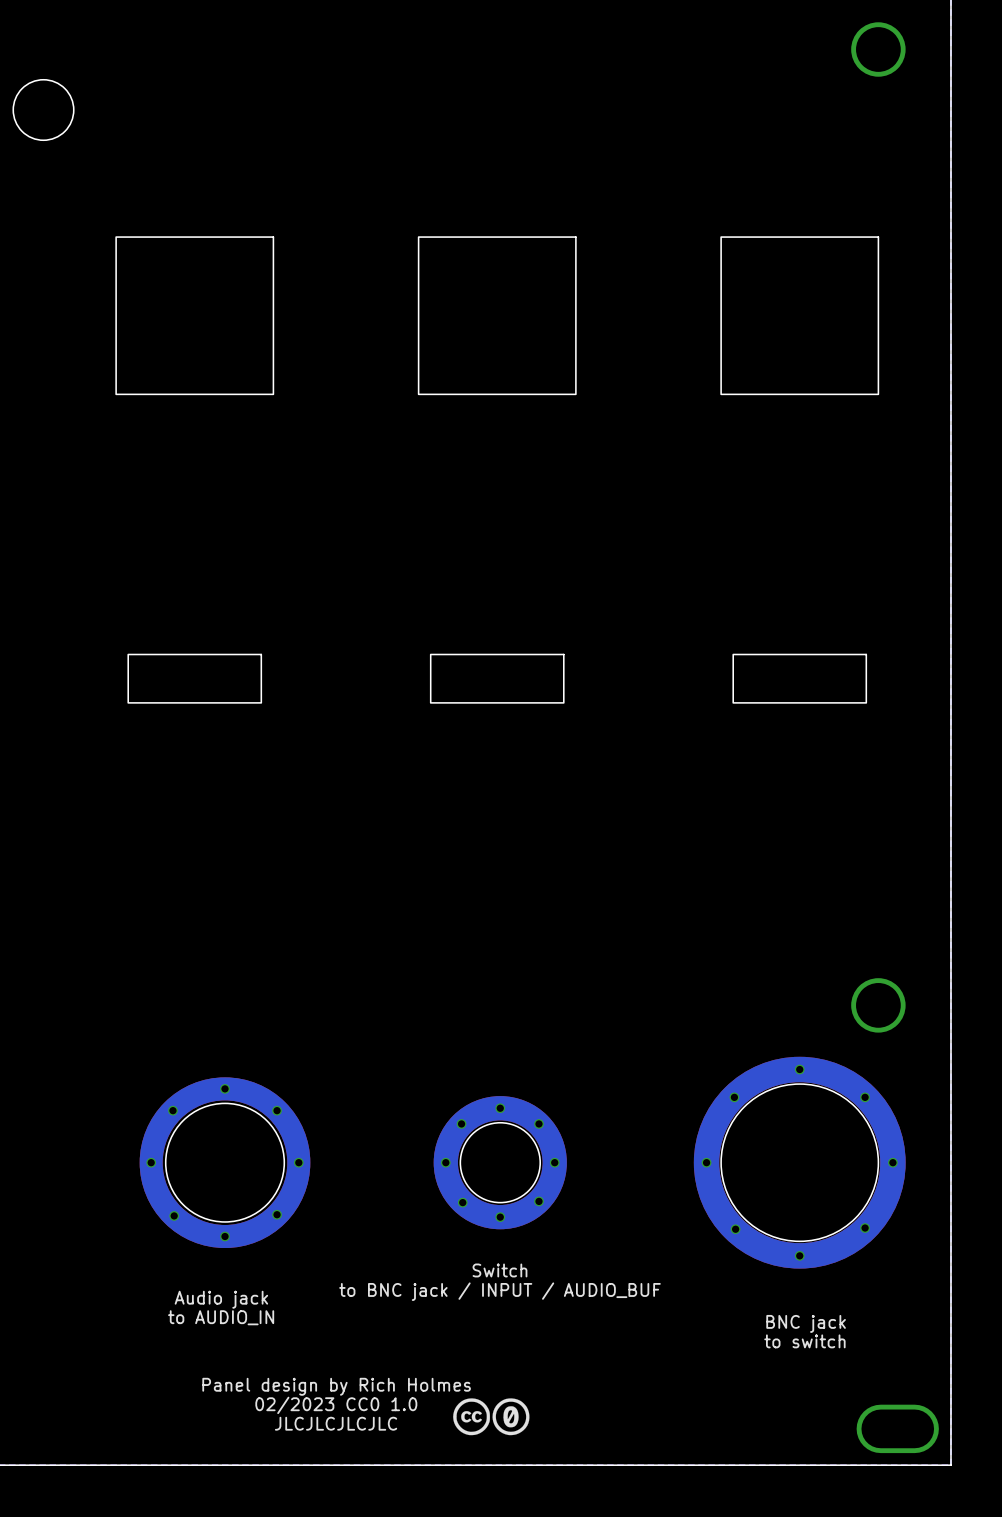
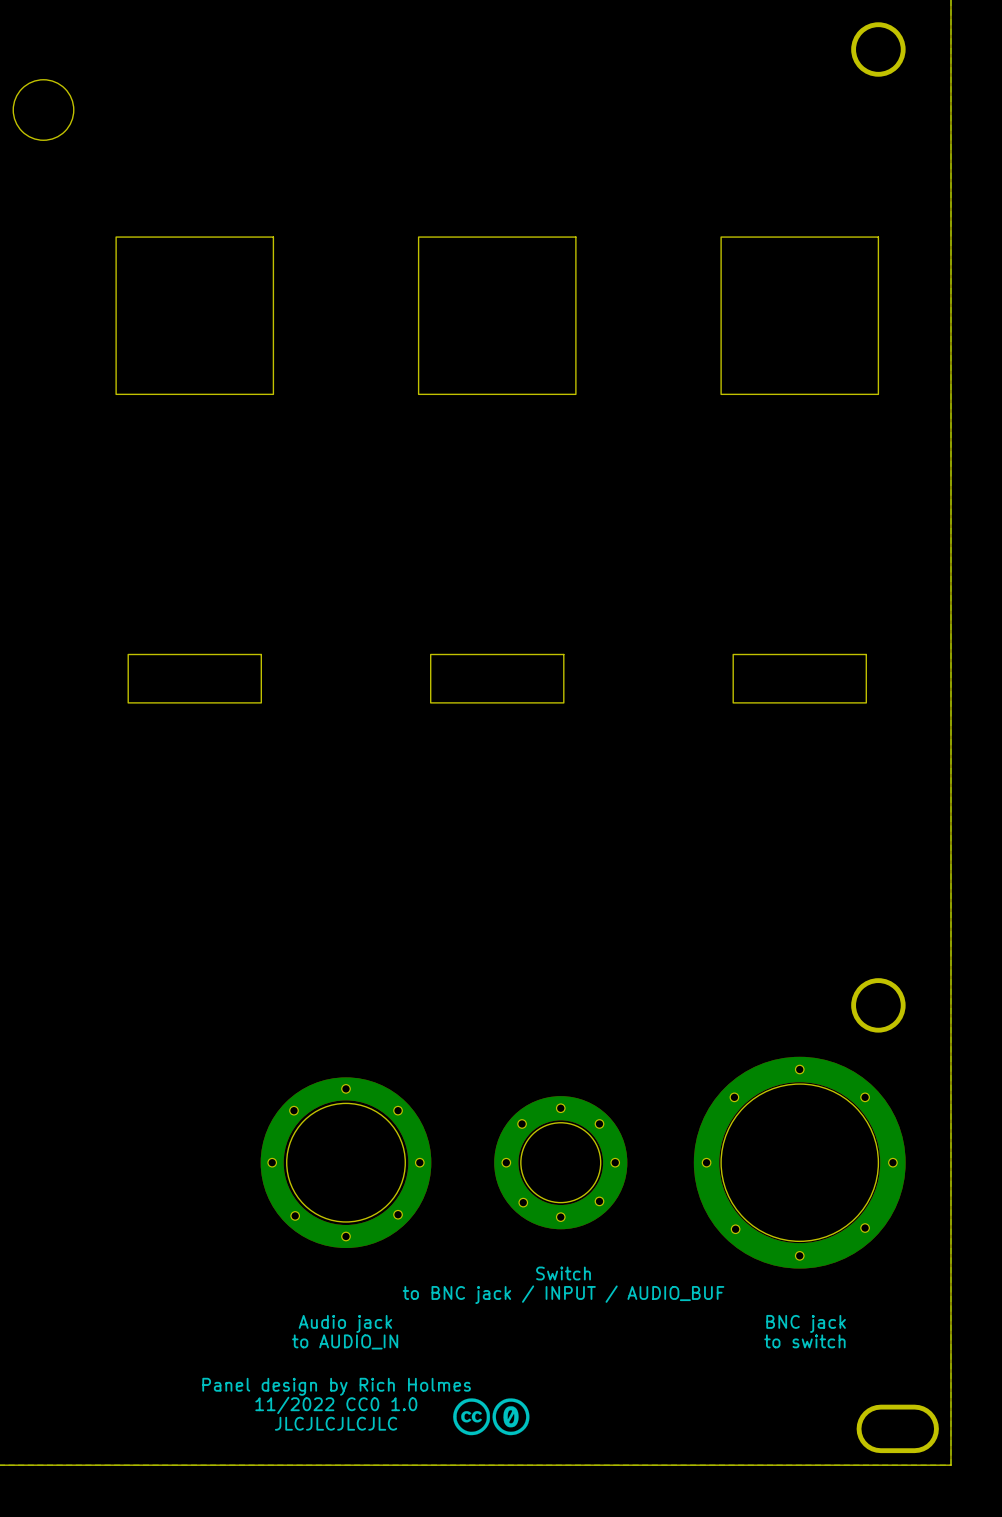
part position: (225, 1162) -> (346, 1162)
part position: (500, 1162) -> (560, 1162)
text position: Switch (499, 1270) -> Switch (563, 1273)
text position: to BNC jack / INPUT / AUDIO_BUF (499, 1291) -> to BNC jack / INPUT / AUDIO_BUF (563, 1294)
text position: Audio jack (221, 1299) -> Audio jack (345, 1323)
text position: to AUDIO_IN (221, 1317) -> to AUDIO_IN (345, 1341)
text: 02/2023 CC0 1.0 (336, 1405) -> 11/2022 CC0 1.0 (336, 1405)

